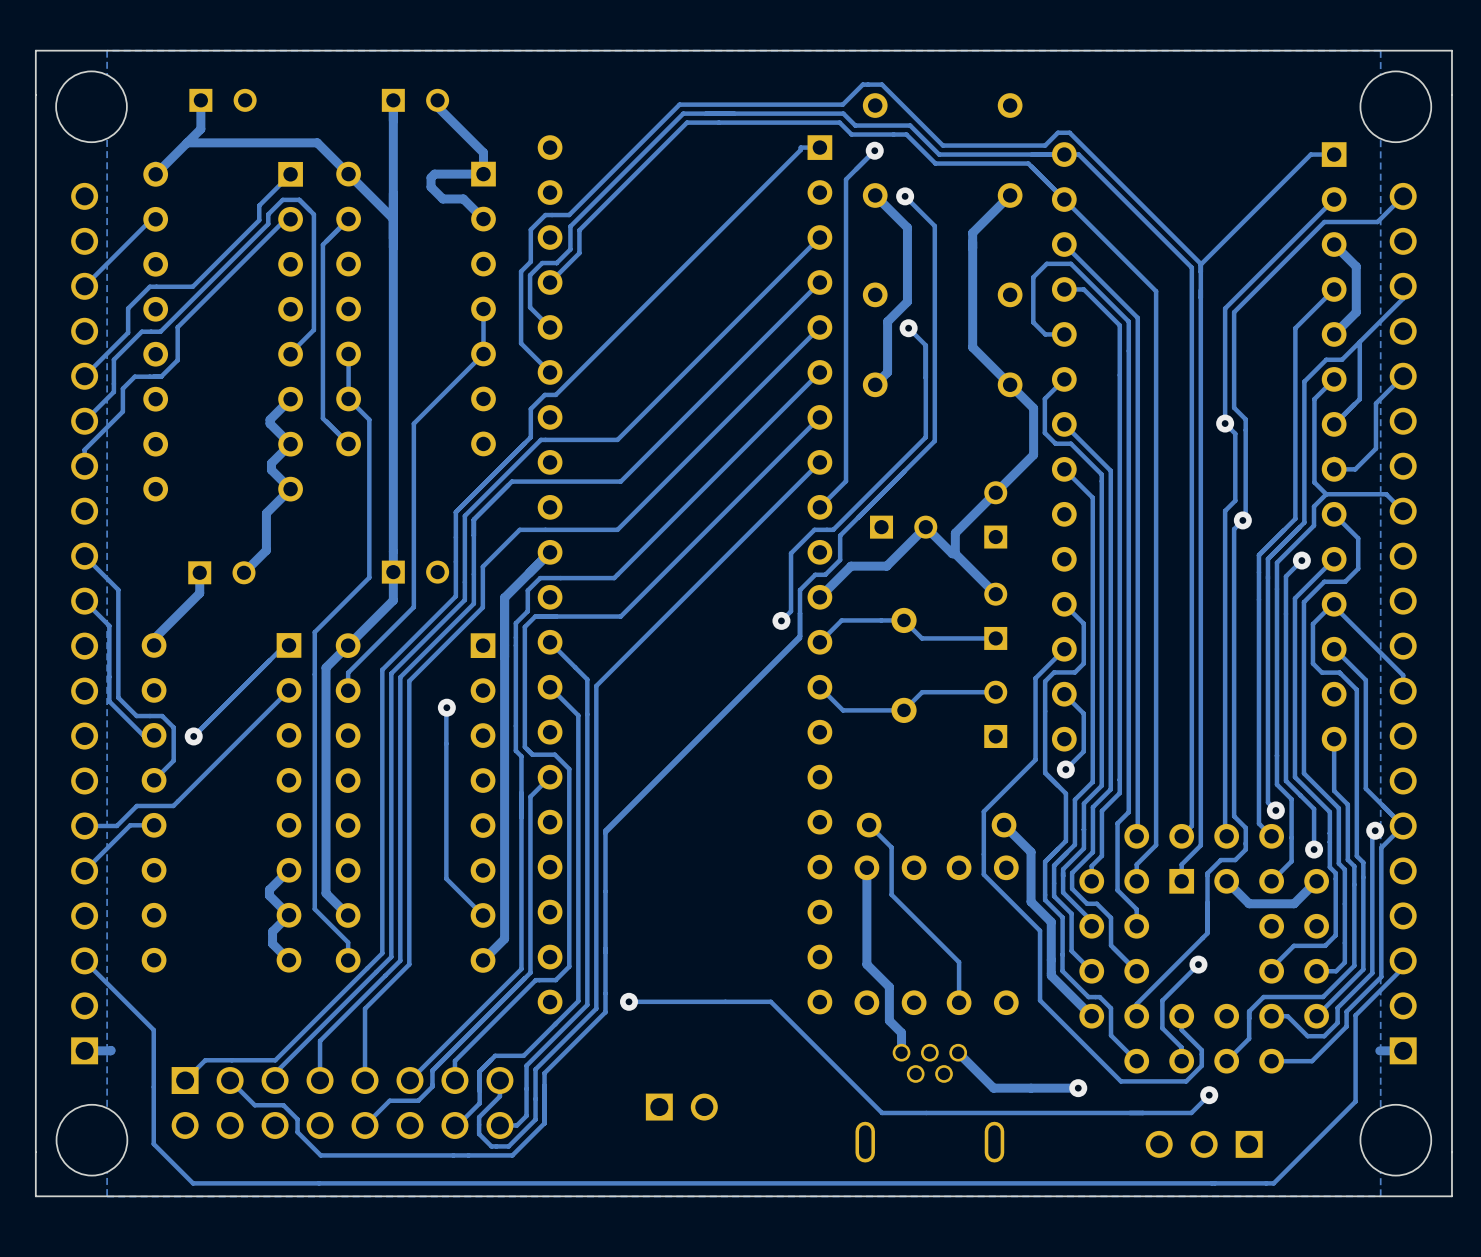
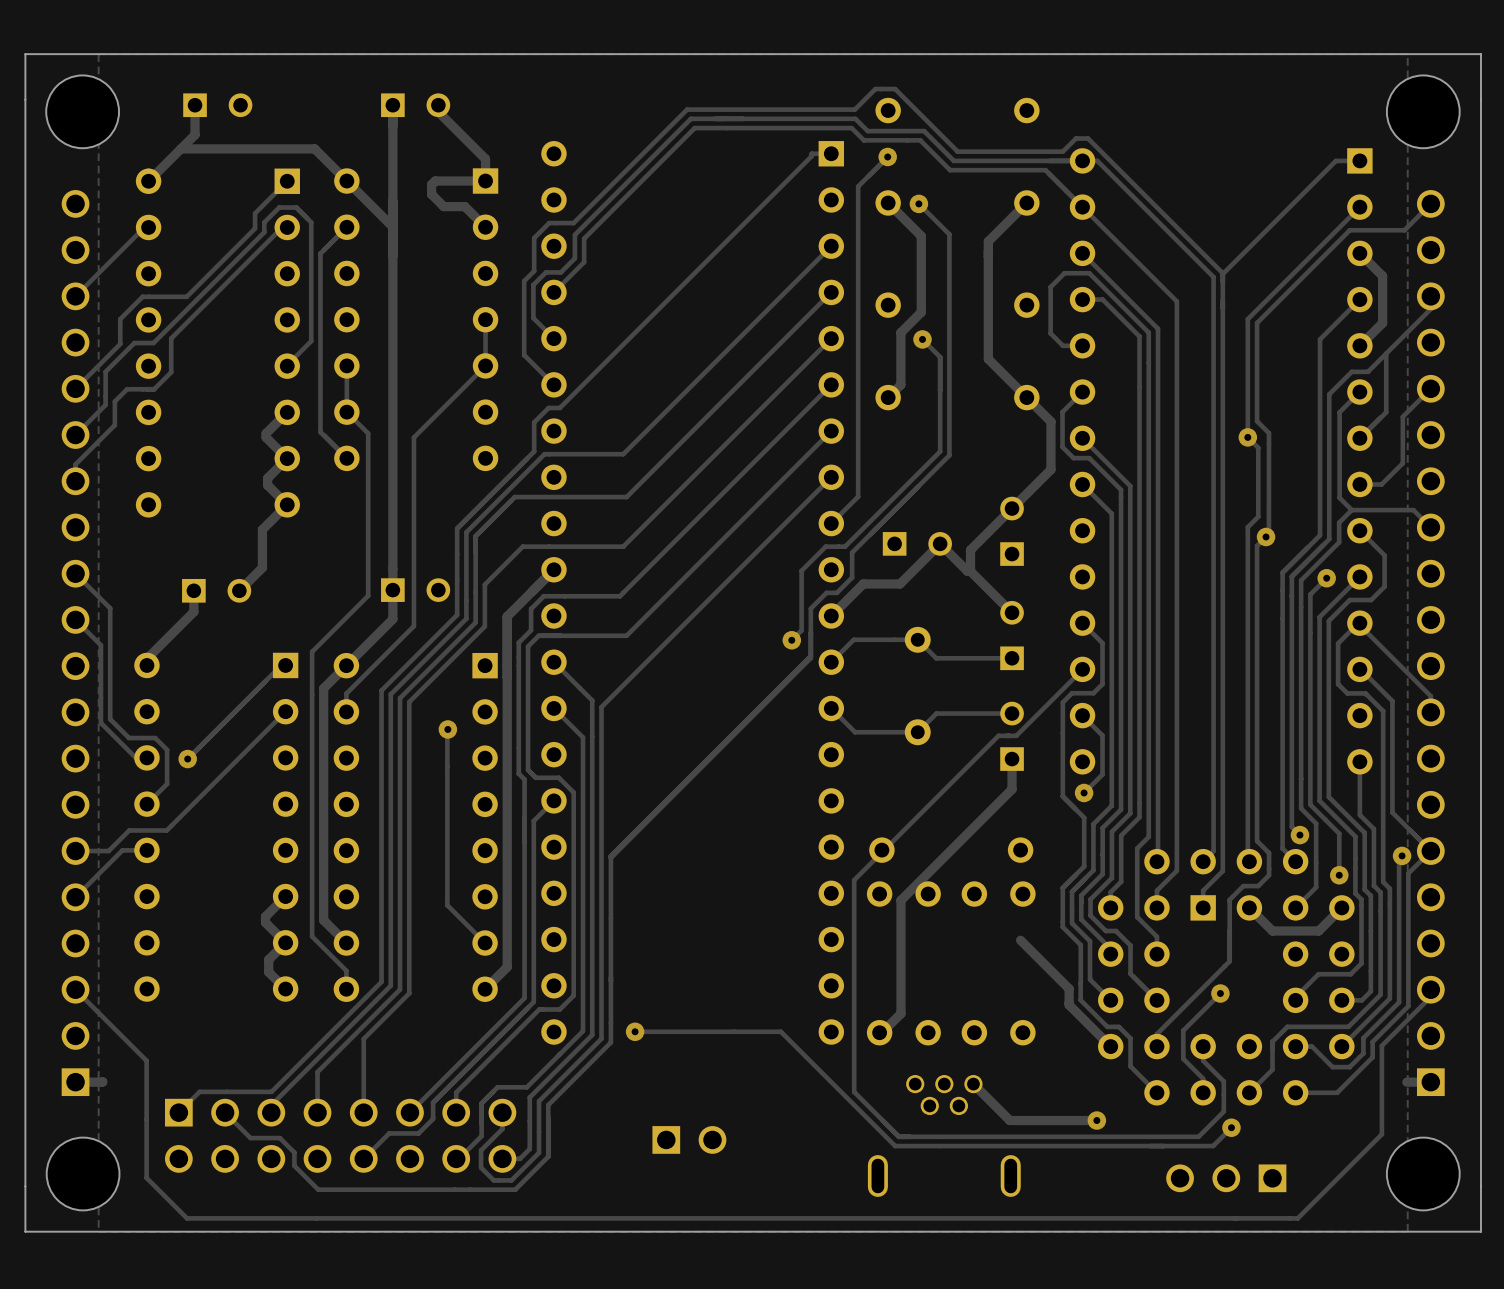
track: (1035, 678) (1035, 759) (983, 811) (983, 874) (1040, 930) (1040, 1000) (1120, 1081) (1186, 1081) (1201, 1065) -> (1052, 699) (1016, 735) (998, 735) (854, 880) (854, 1091) (899, 1136) (1198, 1136) (1223, 1111) (1223, 1097)
track: none -> (1012, 759) (1012, 789) (900, 900) (900, 1013) (881, 1032)
track: (1004, 825) (1031, 852) (1031, 901) (1051, 922) (1051, 959) -> (1020, 940) (1069, 988)
track: (869, 827) (869, 825) (891, 847) (891, 894) (959, 962) (959, 1002) -> none
track: (866, 867) (866, 964) (889, 986) (889, 1020) (901, 1032) (901, 1052) -> none

